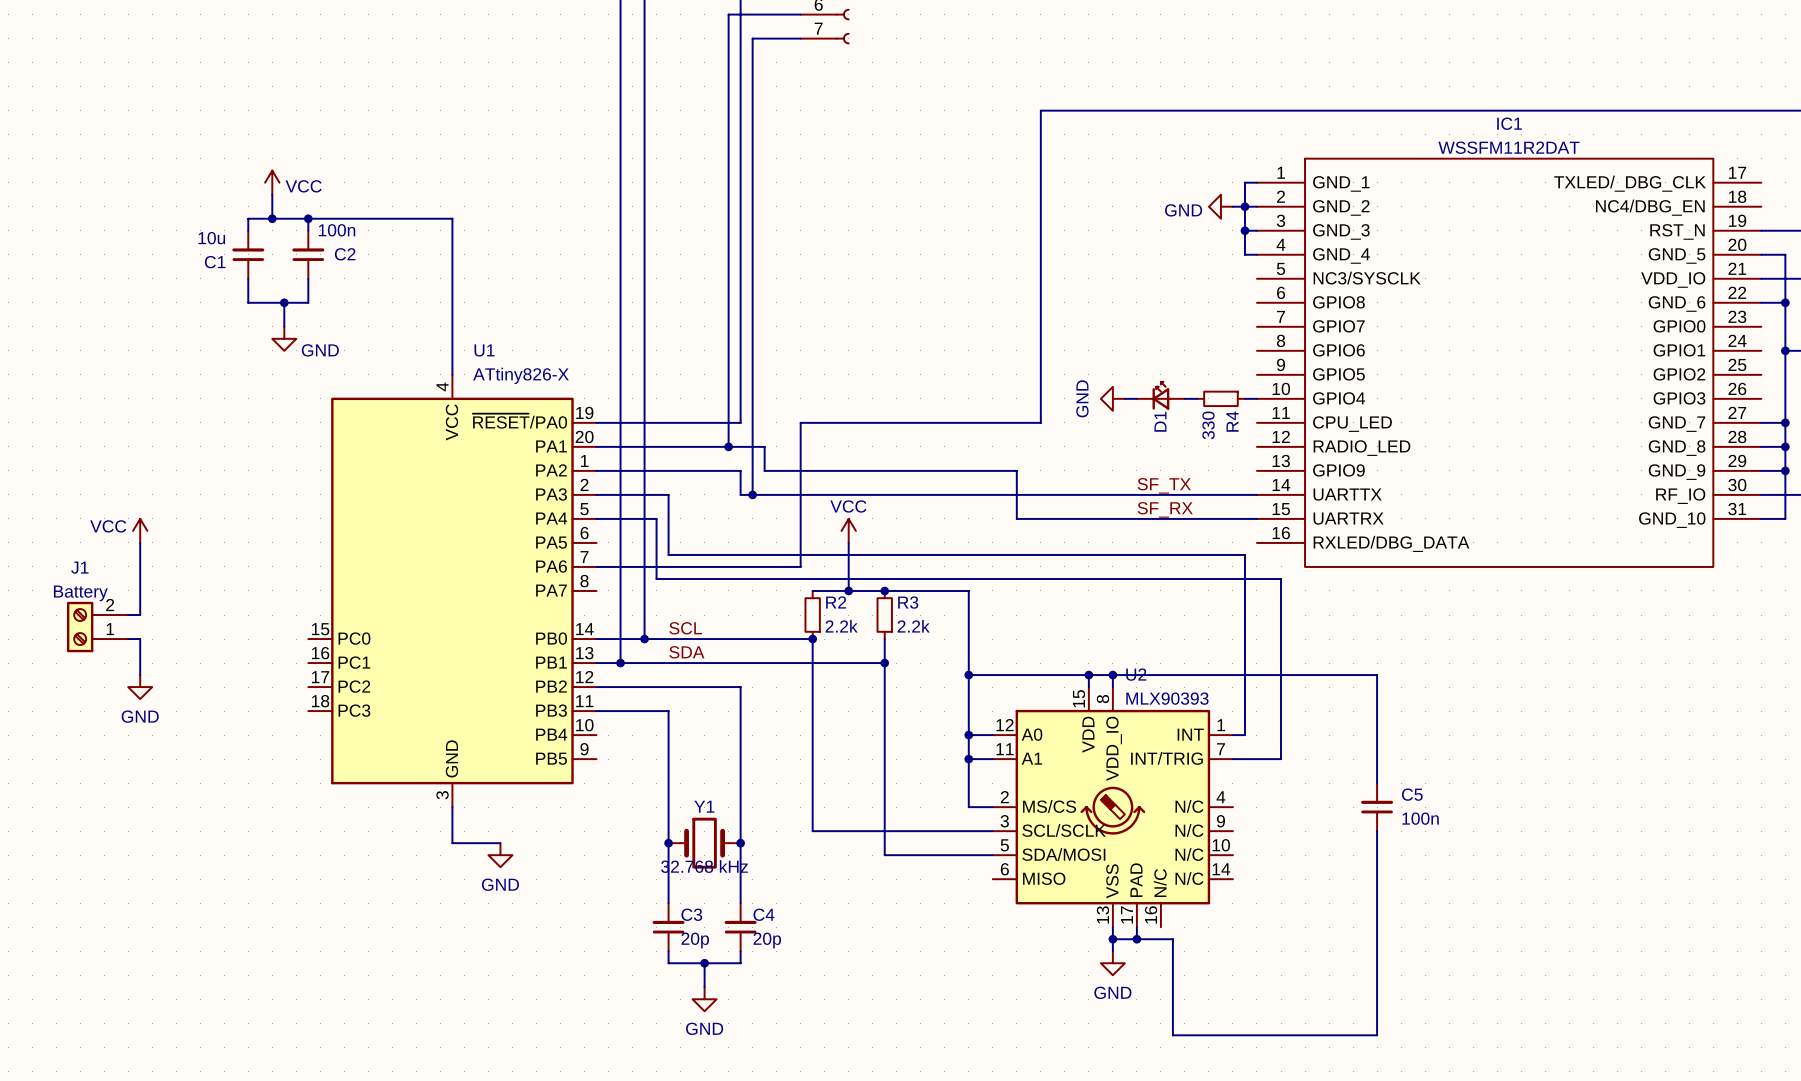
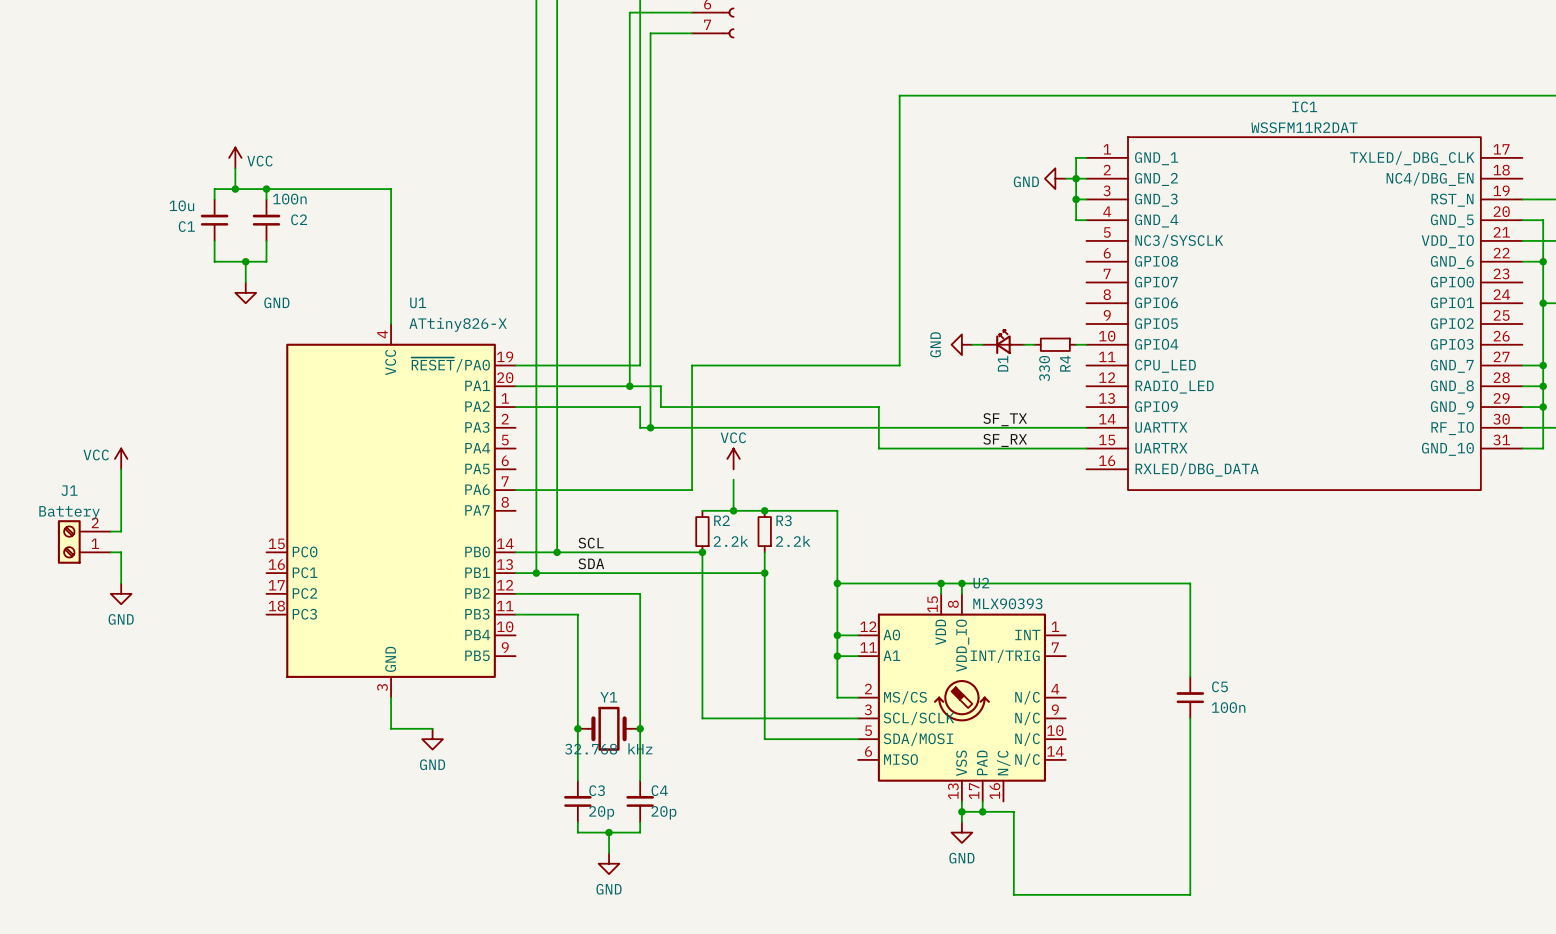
wire: (596, 494) (668, 494) (668, 554) (1244, 554) (1244, 735) (1232, 735) -> none
wire: (596, 518) (656, 518) (656, 578) (1281, 578) (1281, 759) (1232, 759) -> none
wire: (848, 542) (848, 554) -> none

